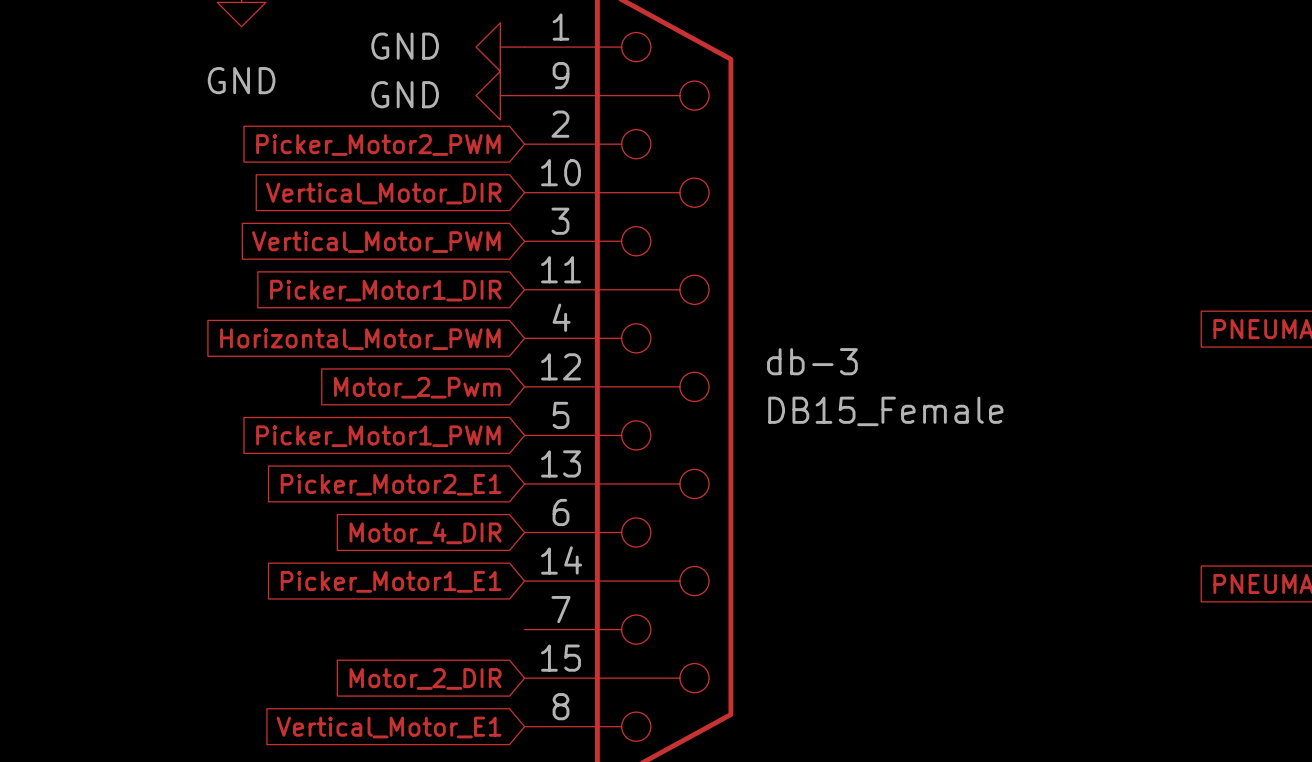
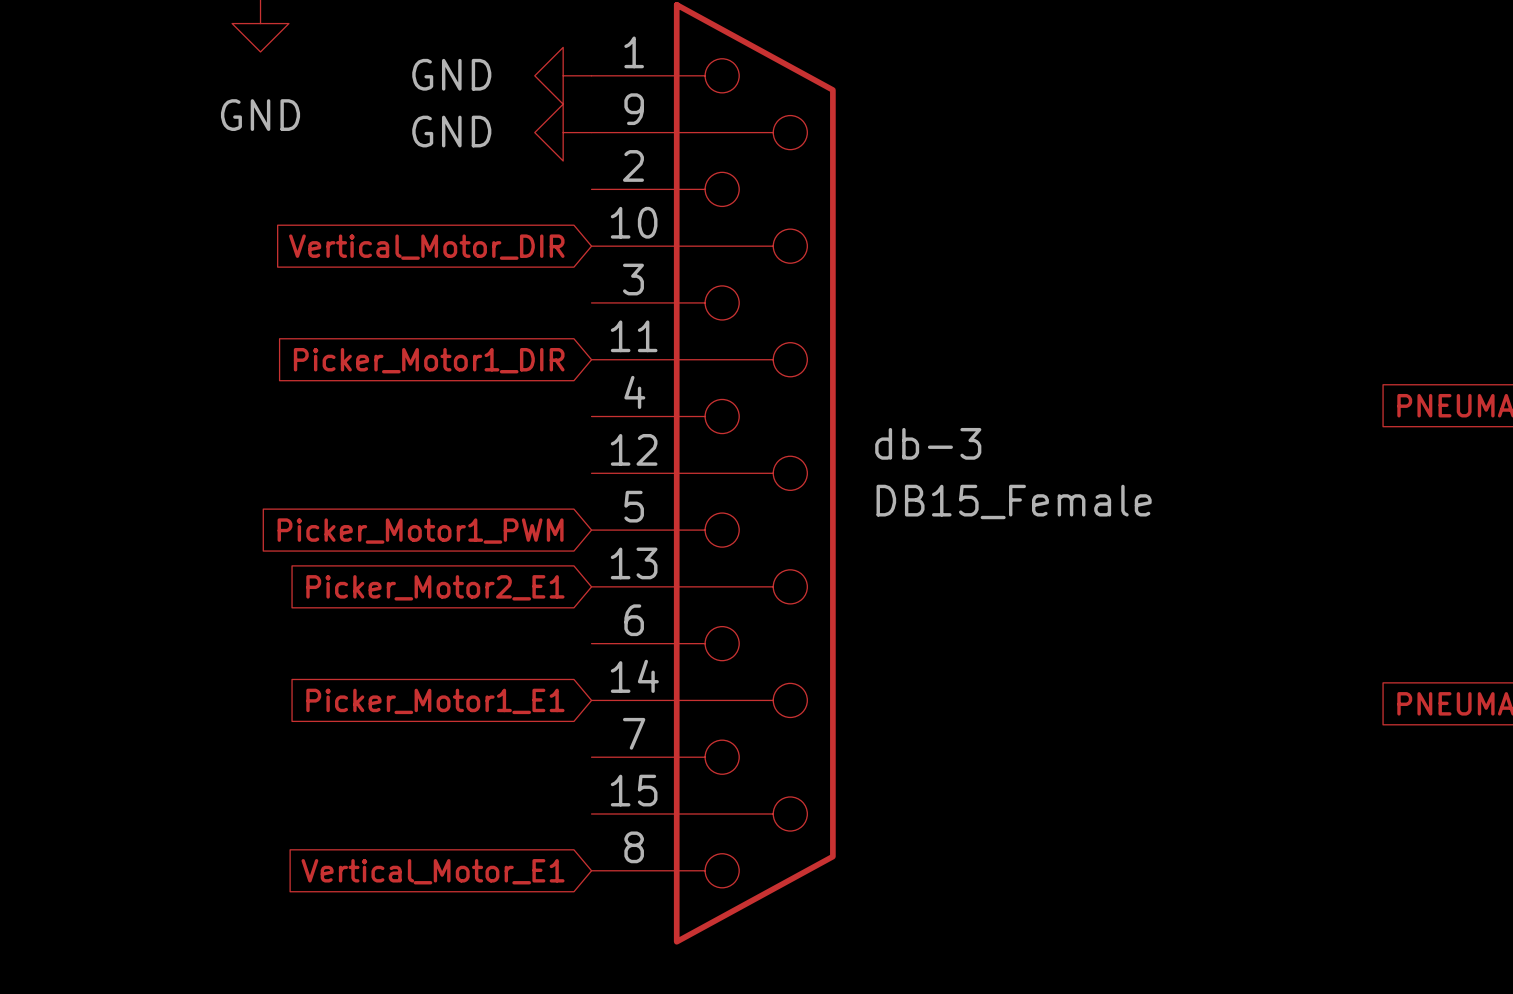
global label: Picker_Motor2_PWM (378, 144) -> none
global label: Vertical_Motor_PWM (376, 242) -> none
global label: Horizontal_Motor_PWM (360, 339) -> none
global label: Motor_2_Pwm (417, 387) -> none
global label: Motor_4_DIR (425, 532) -> none
global label: Motor_2_DIR (425, 678) -> none

